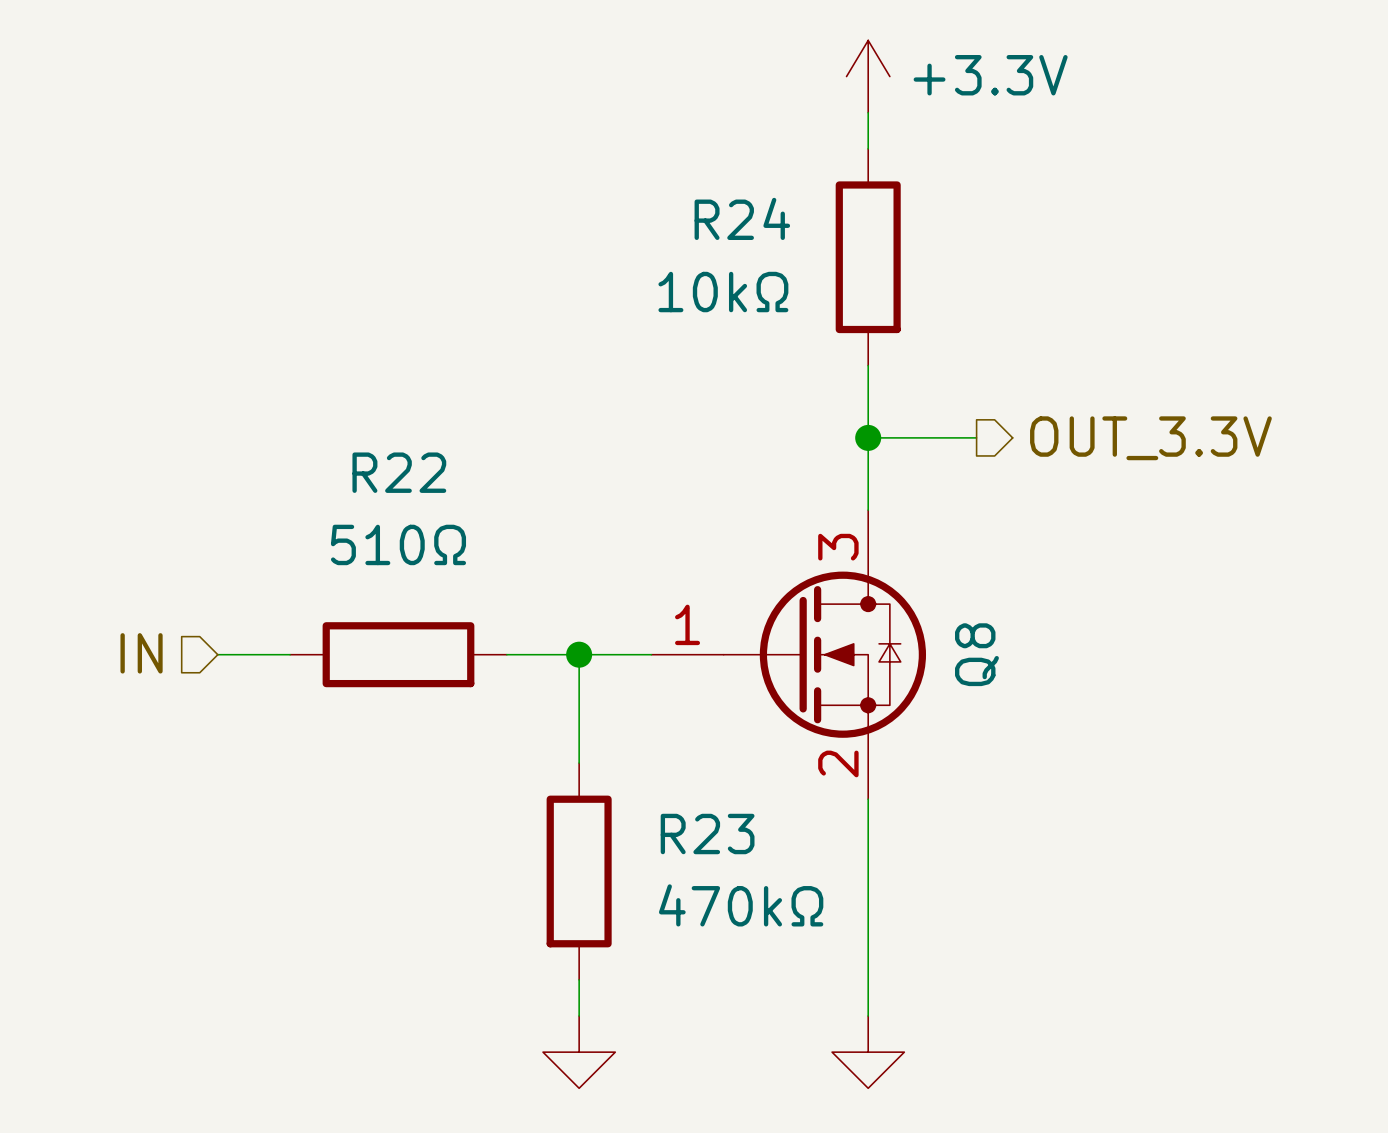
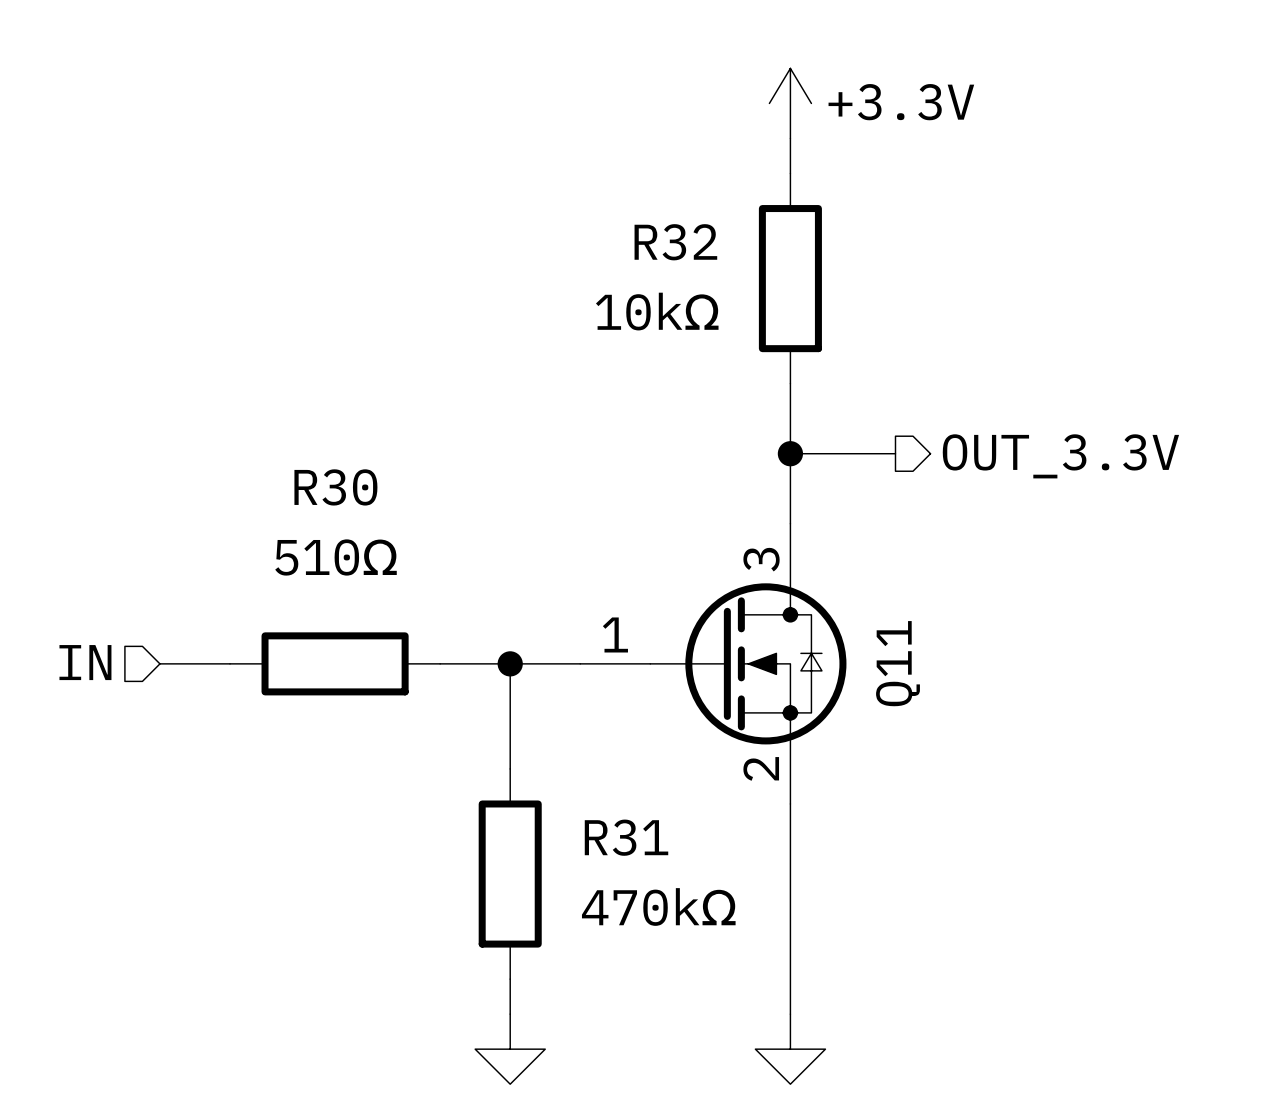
R24 name: R24 (742, 218) -> R32 (675, 242)
R22 name: R22 (399, 472) -> R30 (335, 487)
Q8 name: Q8 (976, 654) -> Q11 (897, 663)
R23 name: R23 (707, 834) -> R31 (626, 837)

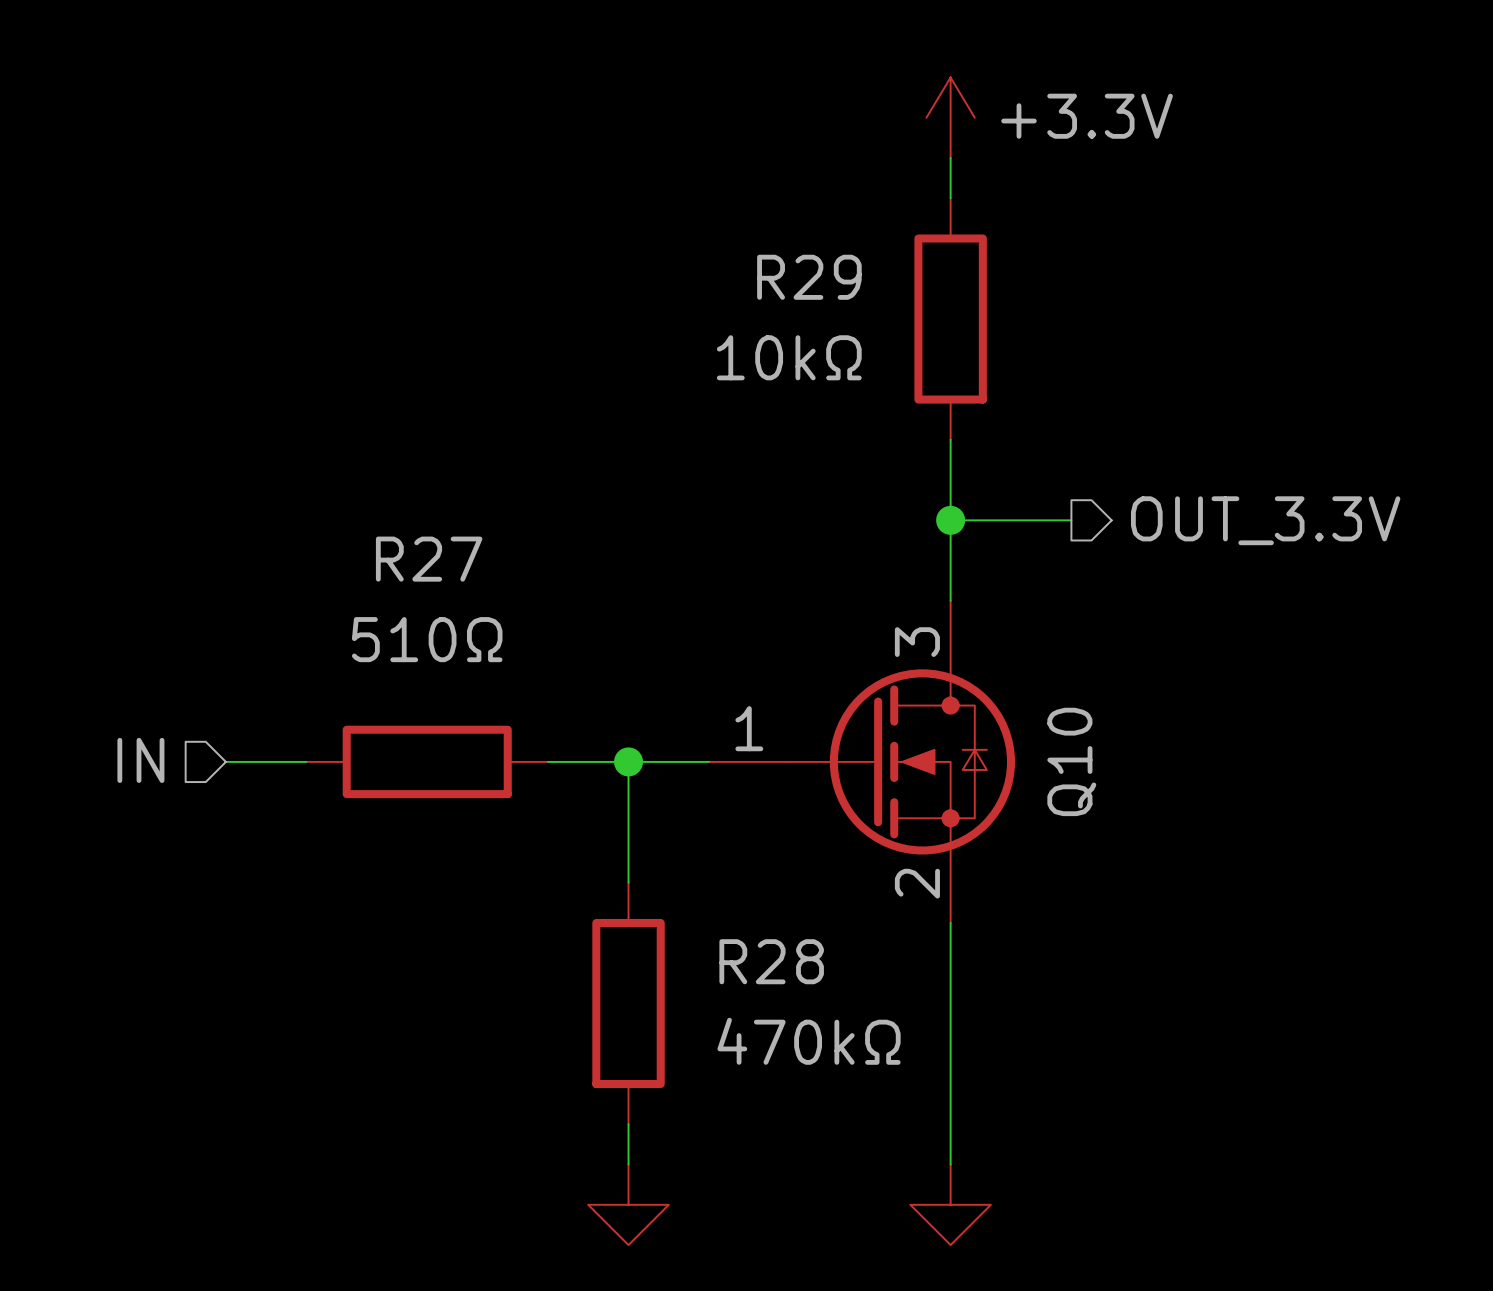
R32 name: R32 (675, 242) -> R29 (809, 277)
R30 name: R30 (335, 487) -> R27 (429, 559)
Q11 name: Q11 (897, 663) -> Q10 (1071, 761)
R31 name: R31 (626, 837) -> R28 (771, 961)

